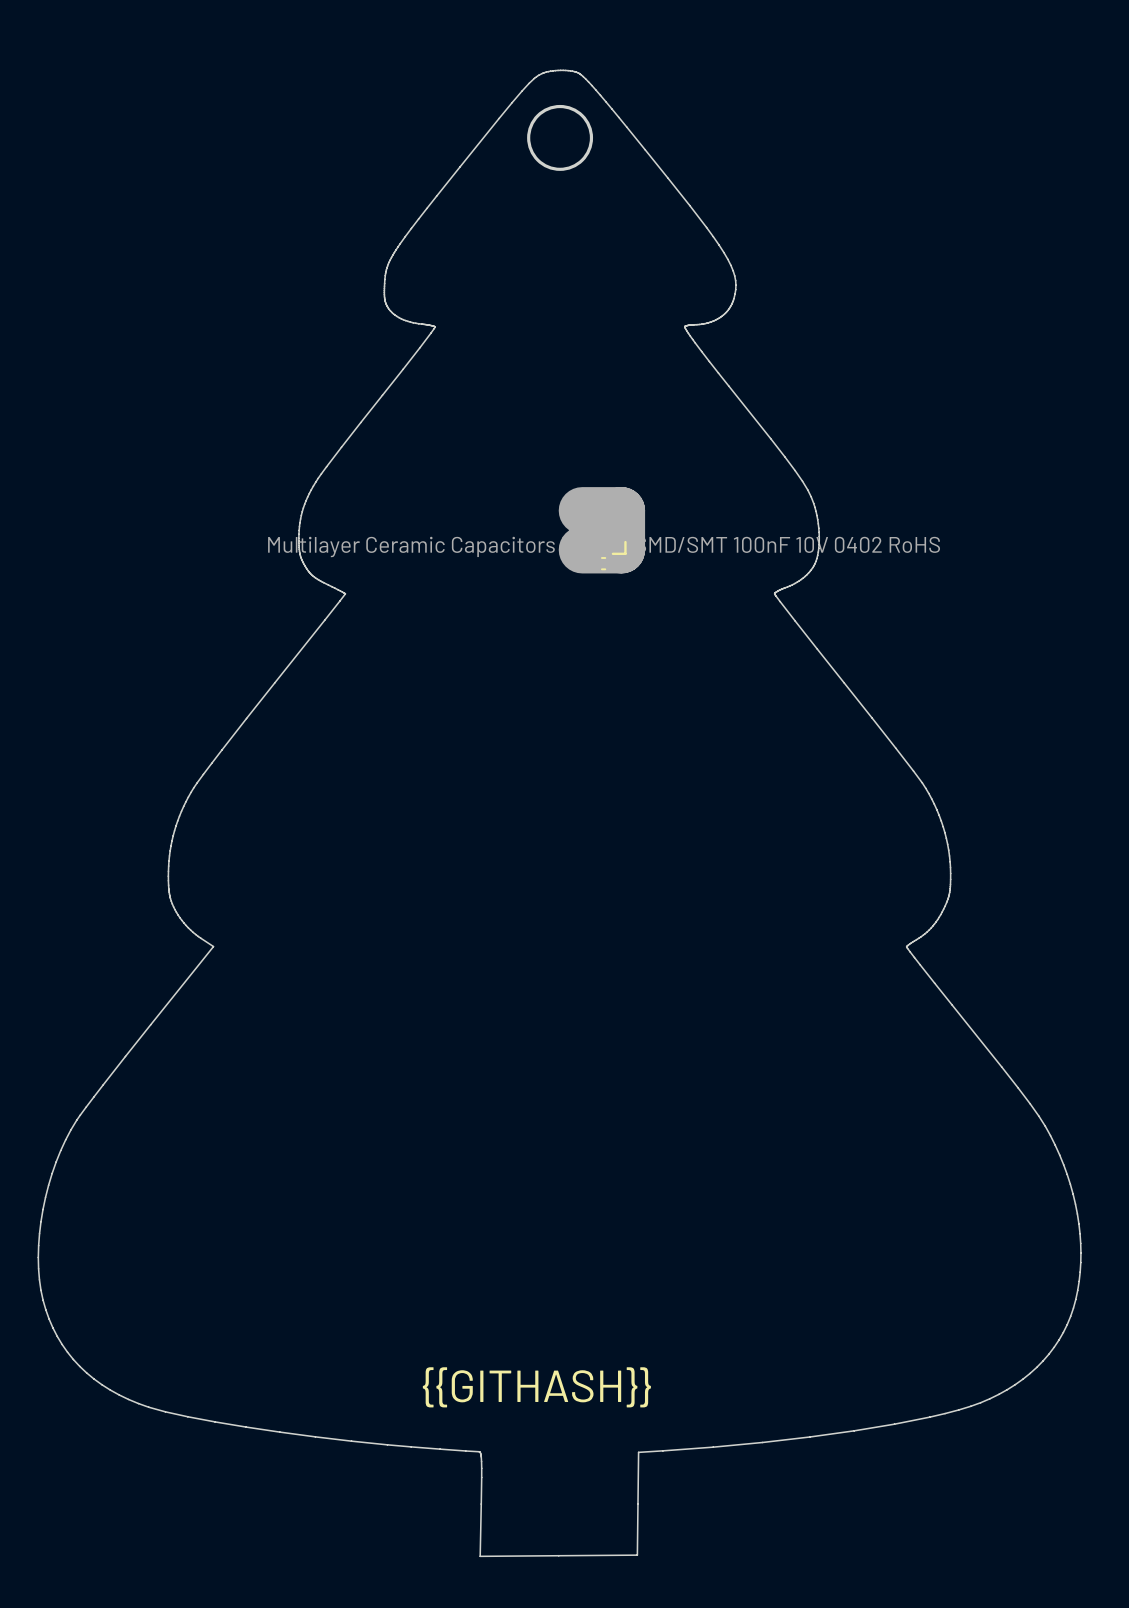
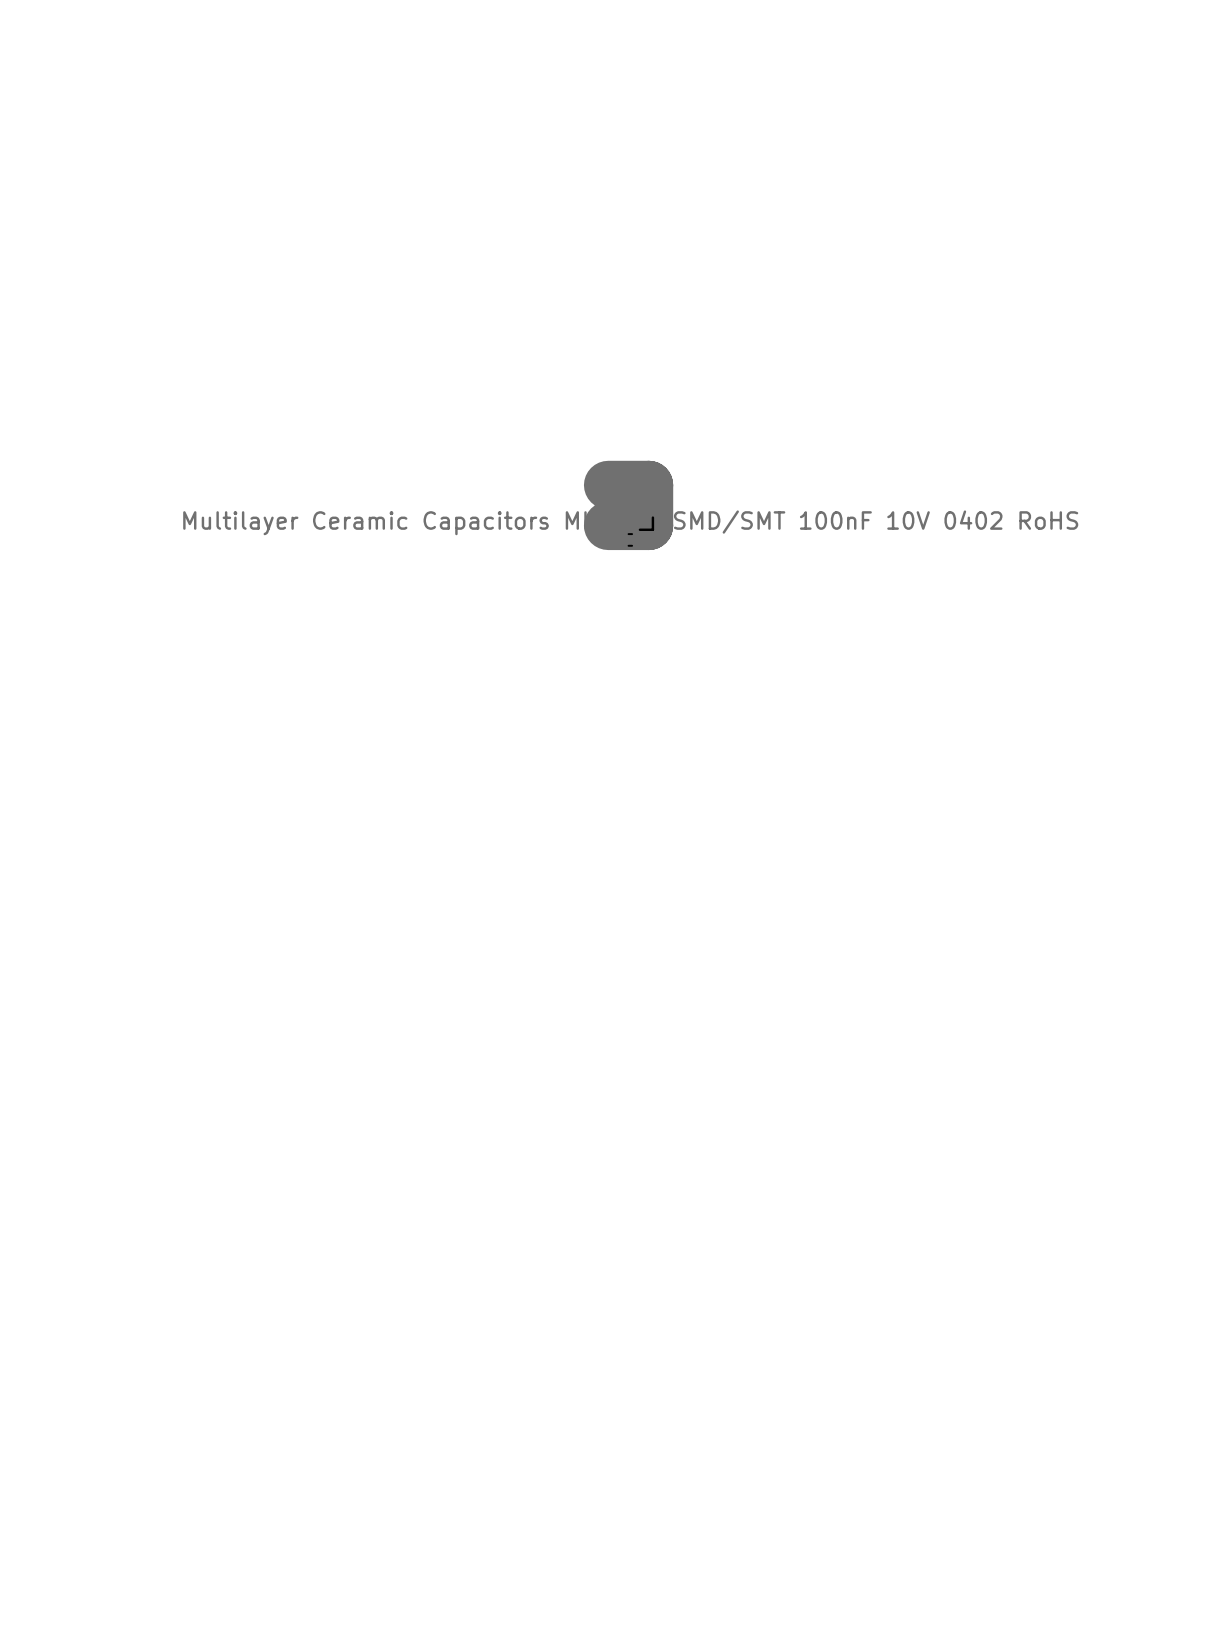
round board edge: [527, 104, 594, 171] -> none
board edge: (434, 326) (403, 319) (388, 307) (384, 298) (384, 286) (385, 271) (390, 259) (418, 219) (521, 91) (538, 75) (560, 70) (578, 73) (595, 90) (689, 205) (719, 245) (730, 265) (734, 275) (735, 289) (728, 309) (712, 321) (684, 326) -> none
board edge: (435, 326) (321, 473) (303, 508) (298, 538) (302, 561) (314, 577) (345, 593) -> none
board edge: (684, 326) (701, 351) (795, 470) (813, 503) (819, 532) (815, 561) (803, 577) (774, 593) -> none
board edge: (345, 593) (211, 763) (185, 801) (177, 821) (171, 845) (168, 871) (169, 895) (174, 909) (183, 922) (195, 934) (213, 946) (76, 1120) (60, 1150) (48, 1185) (40, 1221) (38, 1257) (40, 1290) (45, 1309) (52, 1328) (67, 1352) (86, 1372) (110, 1390) (148, 1407) (215, 1421) (351, 1441) (479, 1451) (481, 1468) (480, 1556) (637, 1555) (638, 1452) (762, 1442) (854, 1430) (945, 1413) (970, 1406) (998, 1394) (1022, 1379) (1043, 1360) (1059, 1340) (1070, 1316) (1077, 1290) (1080, 1262) (1080, 1233) (1075, 1204) (1059, 1155) (1038, 1116) (906, 946) -> none
board edge: (774, 594) (913, 771) (928, 793) (939, 815) (949, 855) (948, 895) (942, 912) (932, 926) (906, 946) -> none
text: {{GITHASH}} (536, 1387) -> none

